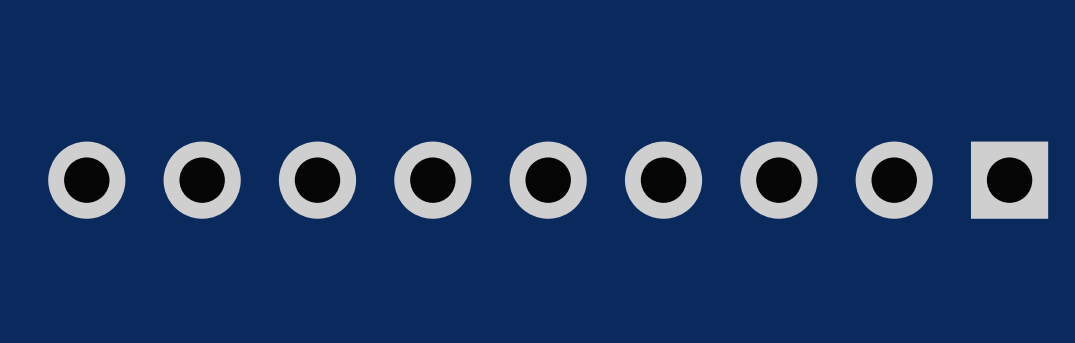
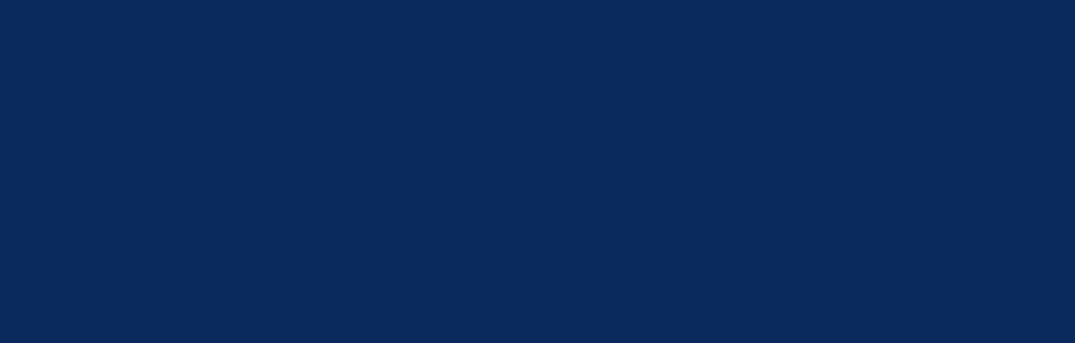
part: (548, 180) -> none

